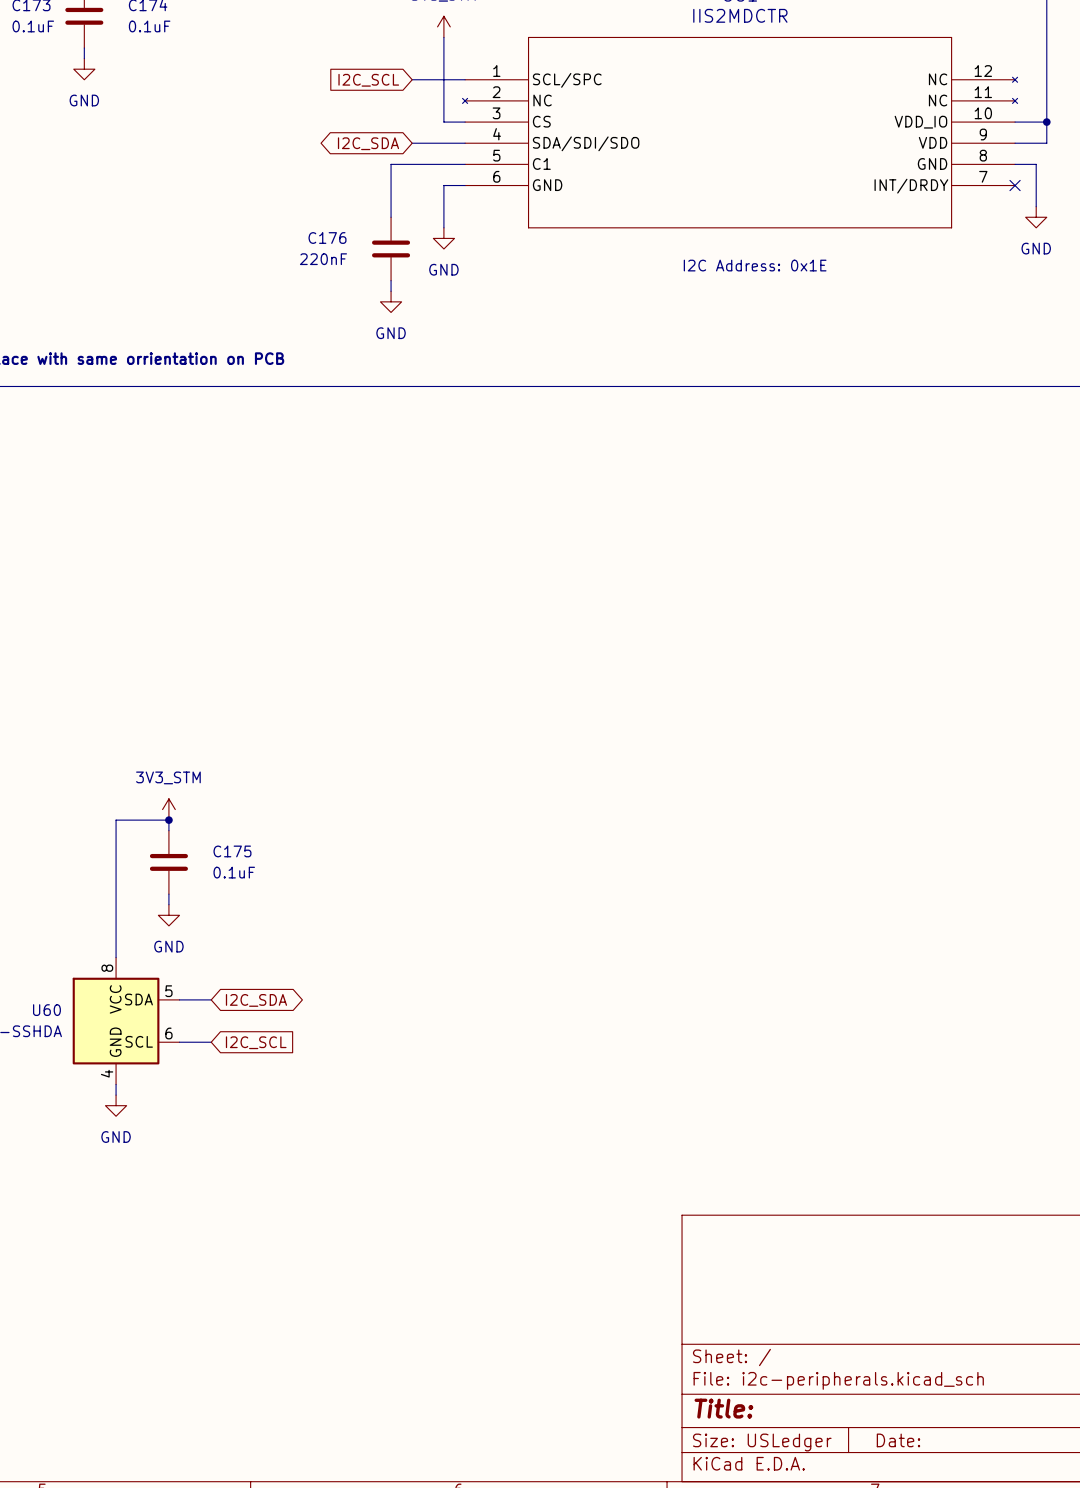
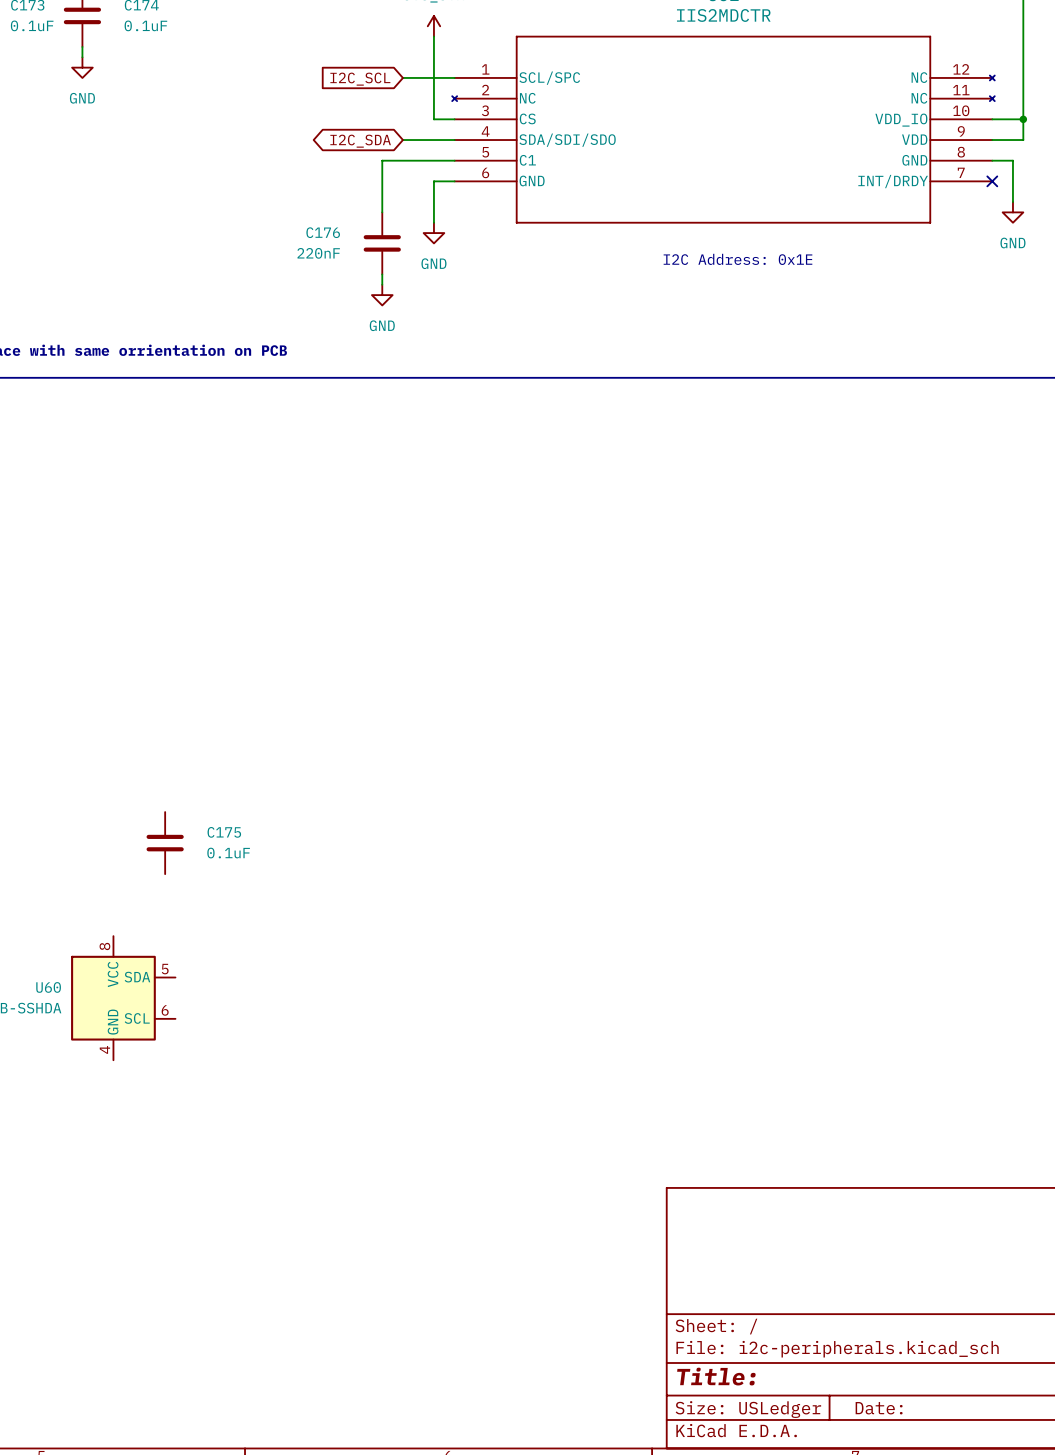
power symbol: 3V3_STM (168, 809) -> none
junction: (168, 820) -> none
wire: (168, 830) (168, 820) (116, 820) (116, 957) -> none
wire: (168, 894) (168, 904) -> none
power symbol: GND (168, 915) -> none
wire: (179, 999) (211, 999) -> none
global label: I2C_SDA (256, 1000) -> none
wire: (179, 1042) (211, 1042) -> none
global label: I2C_SCL (256, 1042) -> none
wire: (116, 1084) (116, 1095) -> none
power symbol: GND (116, 1105) -> none

